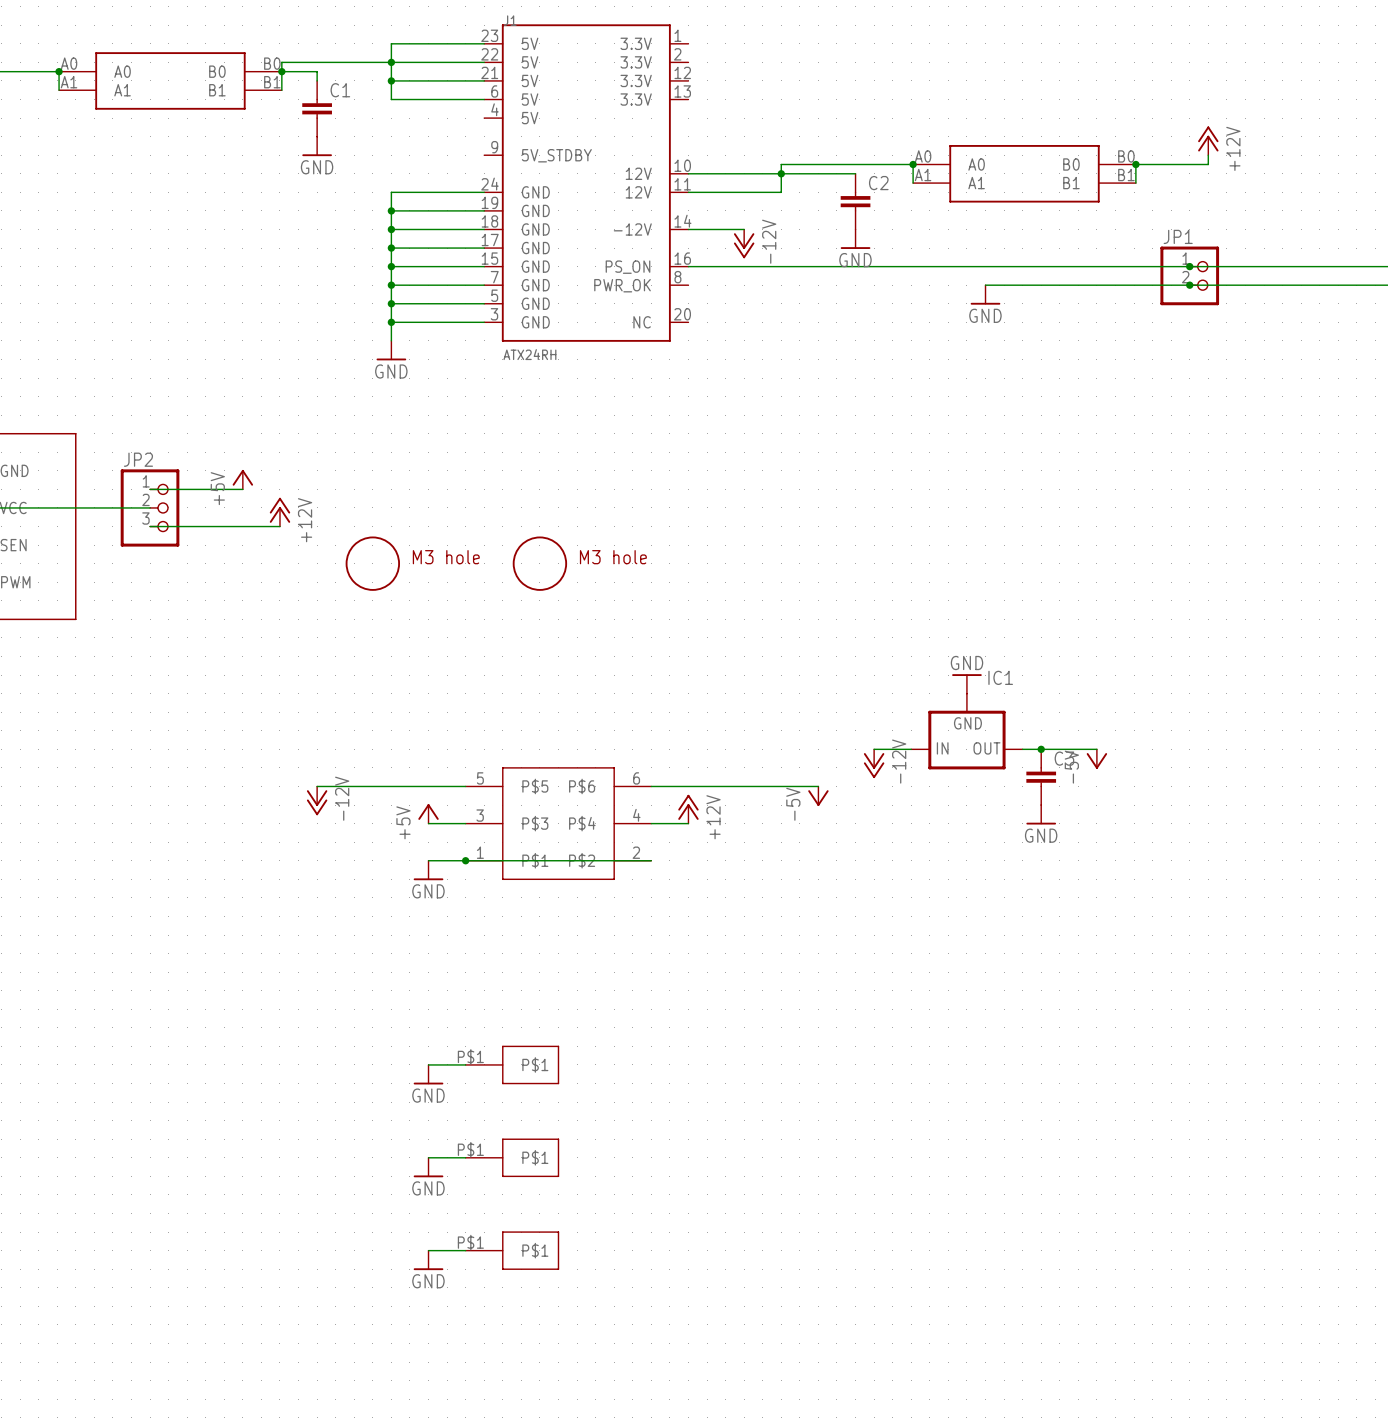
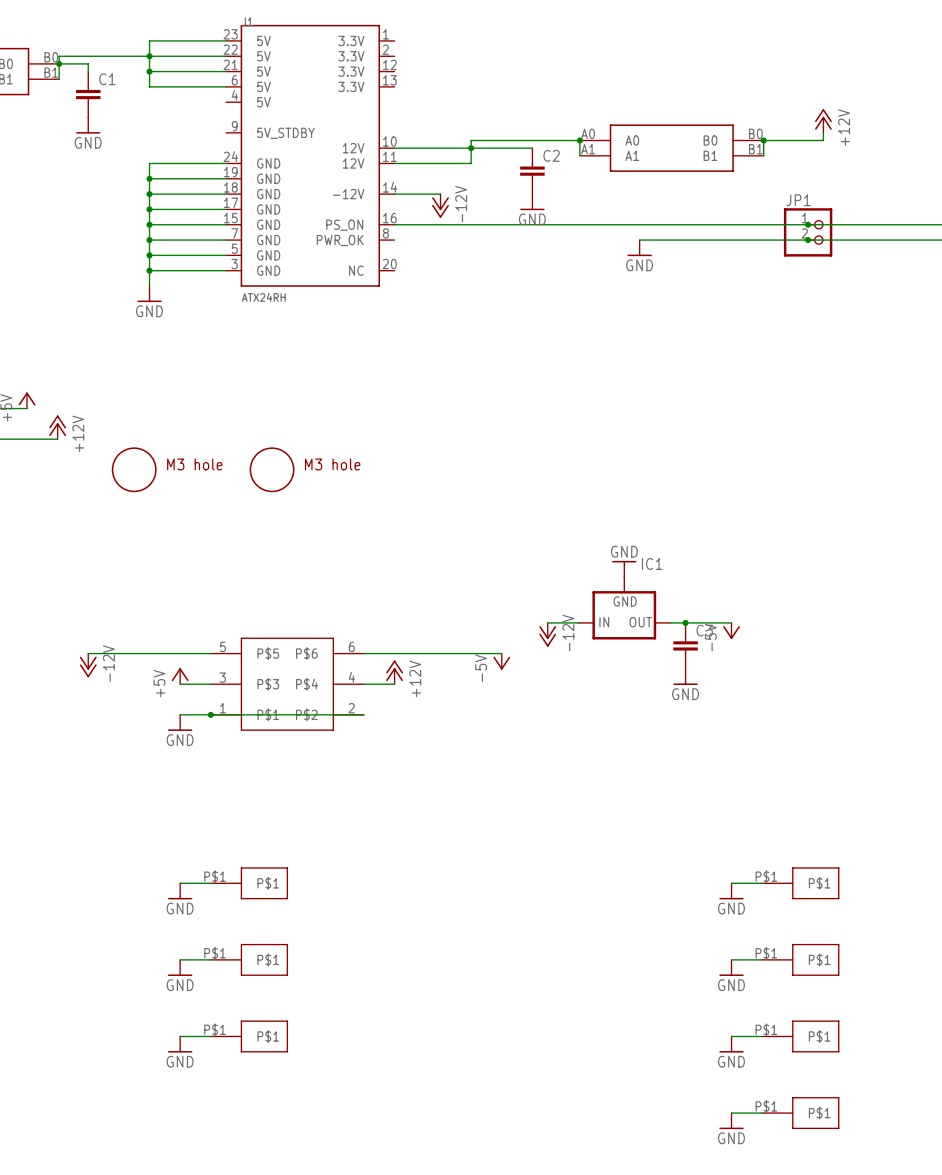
wire: none -> (731, 883) (762, 883)
part: none -> (800, 883)
power symbol: none -> GND (731, 891)
wire: none -> (731, 959) (762, 959)
part: none -> (800, 959)
power symbol: none -> GND (731, 967)
wire: none -> (731, 1036) (762, 1036)
part: none -> (800, 1036)
power symbol: none -> GND (731, 1044)
wire: none -> (731, 1113) (762, 1113)
part: none -> (800, 1113)
power symbol: none -> GND (731, 1121)

